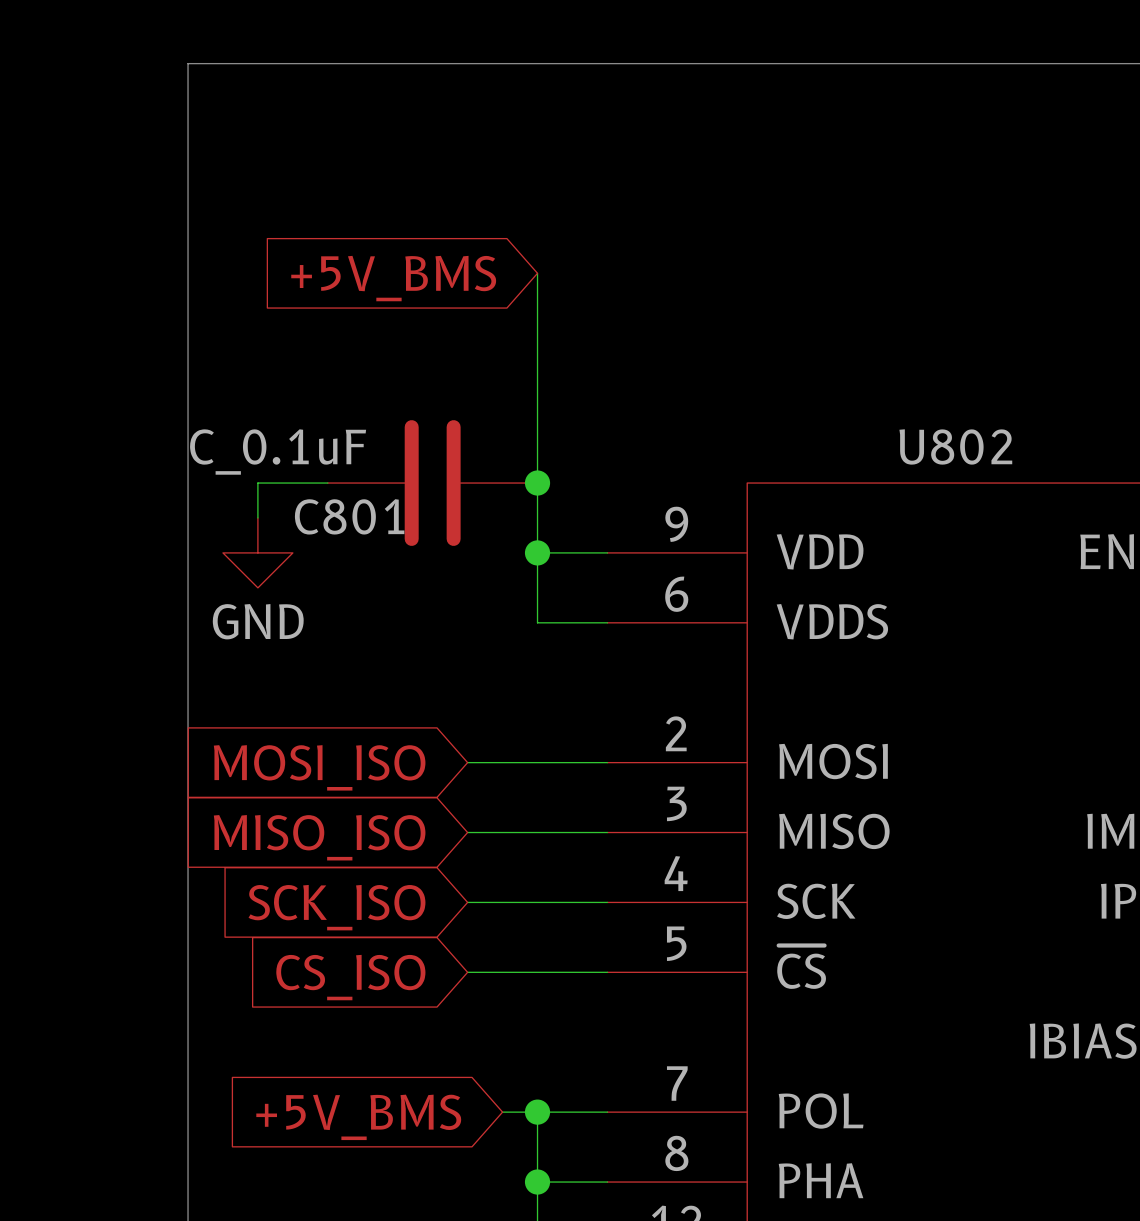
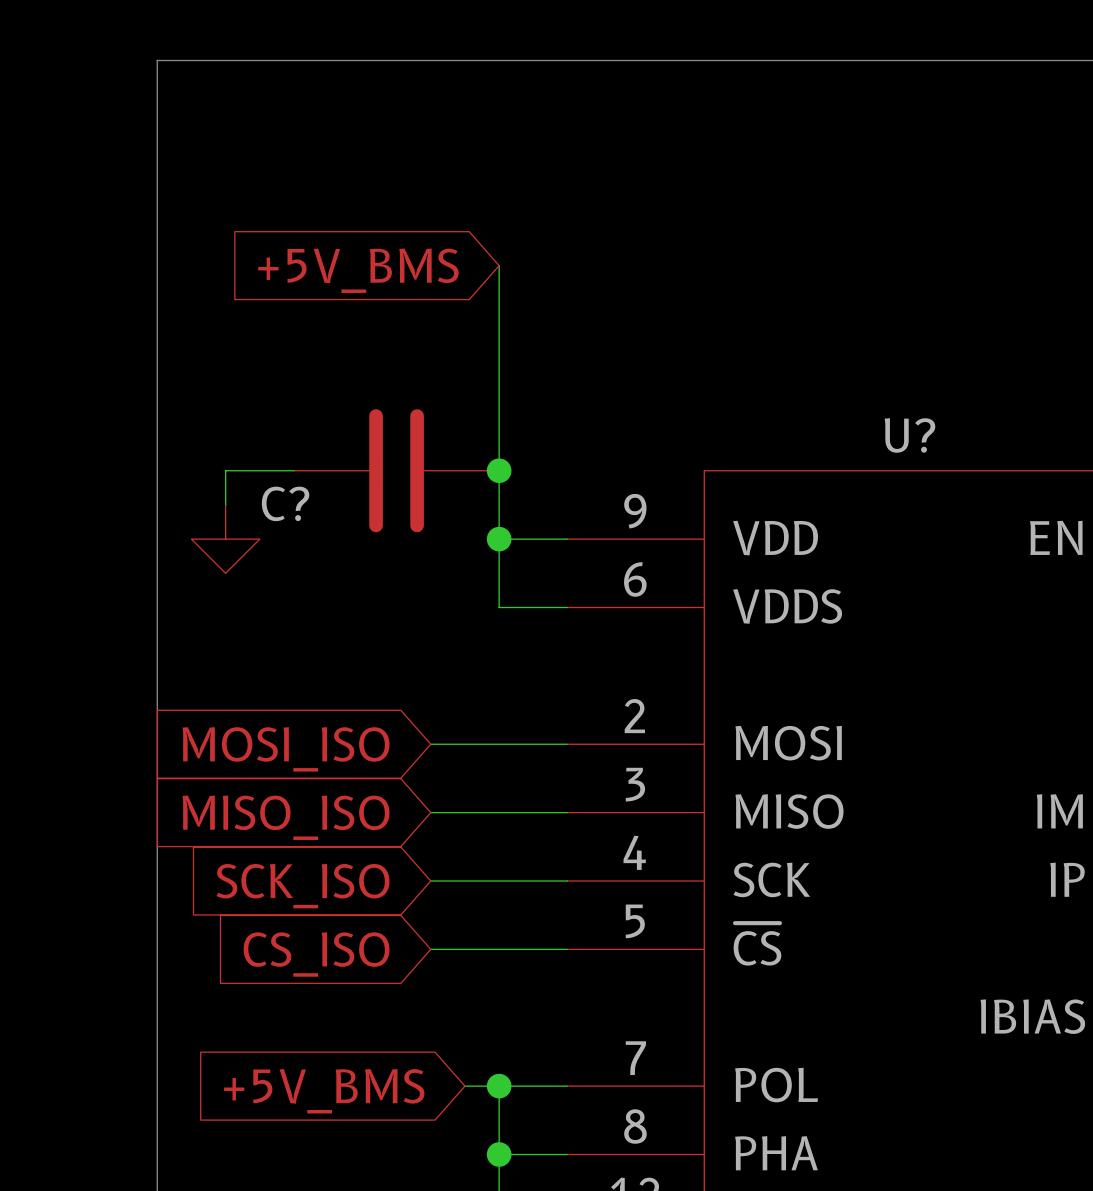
U802 name: U802 (955, 446) -> U? (909, 435)
C801 value: C_0.1uF (278, 452) -> none
C801 name: C801 (349, 516) -> C? (285, 503)
power symbol text: GND (258, 621) -> none

